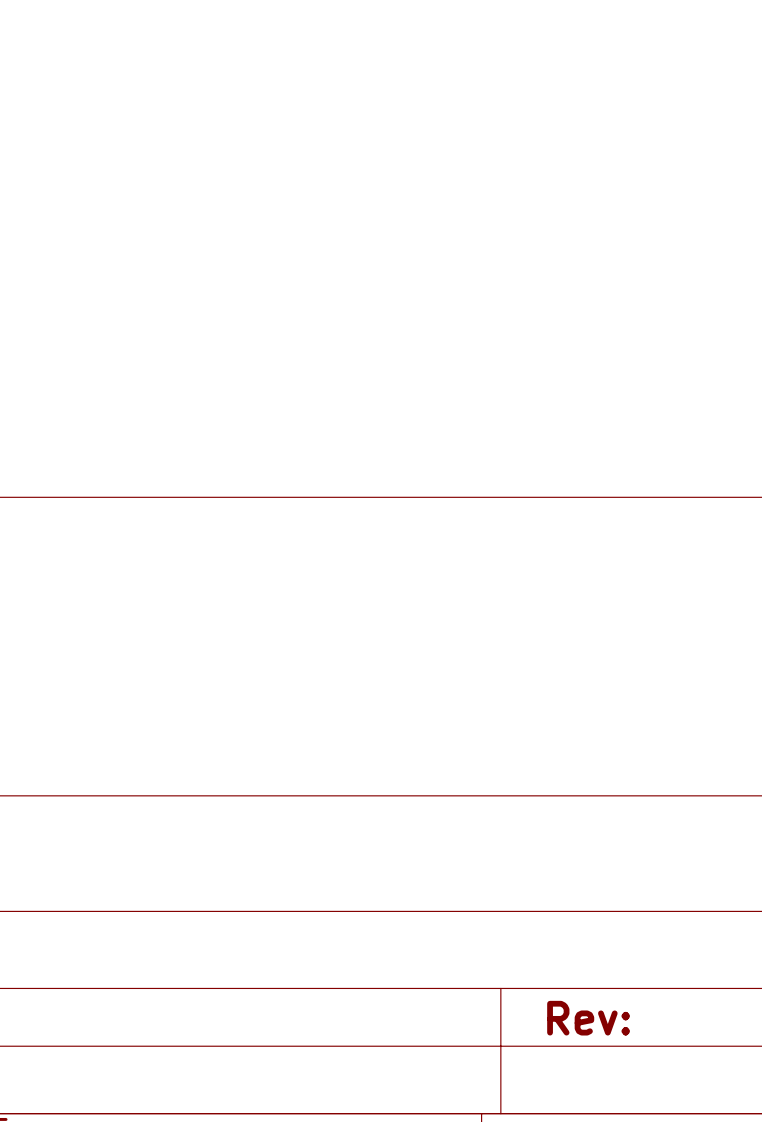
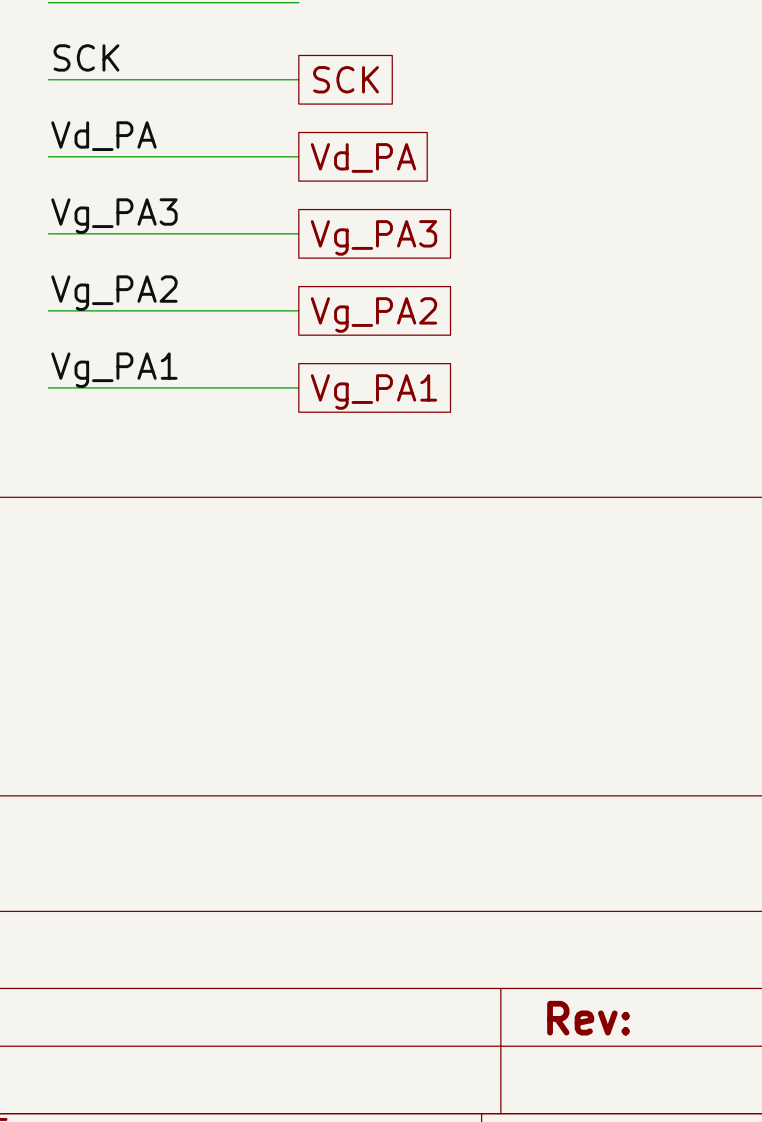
wire: none -> (48, 2) (298, 2)
label: none -> SCK (86, 57)
wire: none -> (48, 79) (298, 79)
global label: none -> SCK (346, 79)
label: none -> Vd_PA (103, 136)
wire: none -> (48, 156) (298, 156)
global label: none -> Vd_PA (363, 157)
label: none -> Vg_PA3 (114, 216)
wire: none -> (48, 233) (298, 233)
global label: none -> Vg_PA3 (373, 237)
label: none -> Vg_PA2 (114, 293)
wire: none -> (48, 310) (298, 310)
global label: none -> Vg_PA2 (373, 314)
label: none -> Vg_PA1 (114, 370)
wire: none -> (48, 387) (298, 387)
global label: none -> Vg_PA1 (373, 392)

